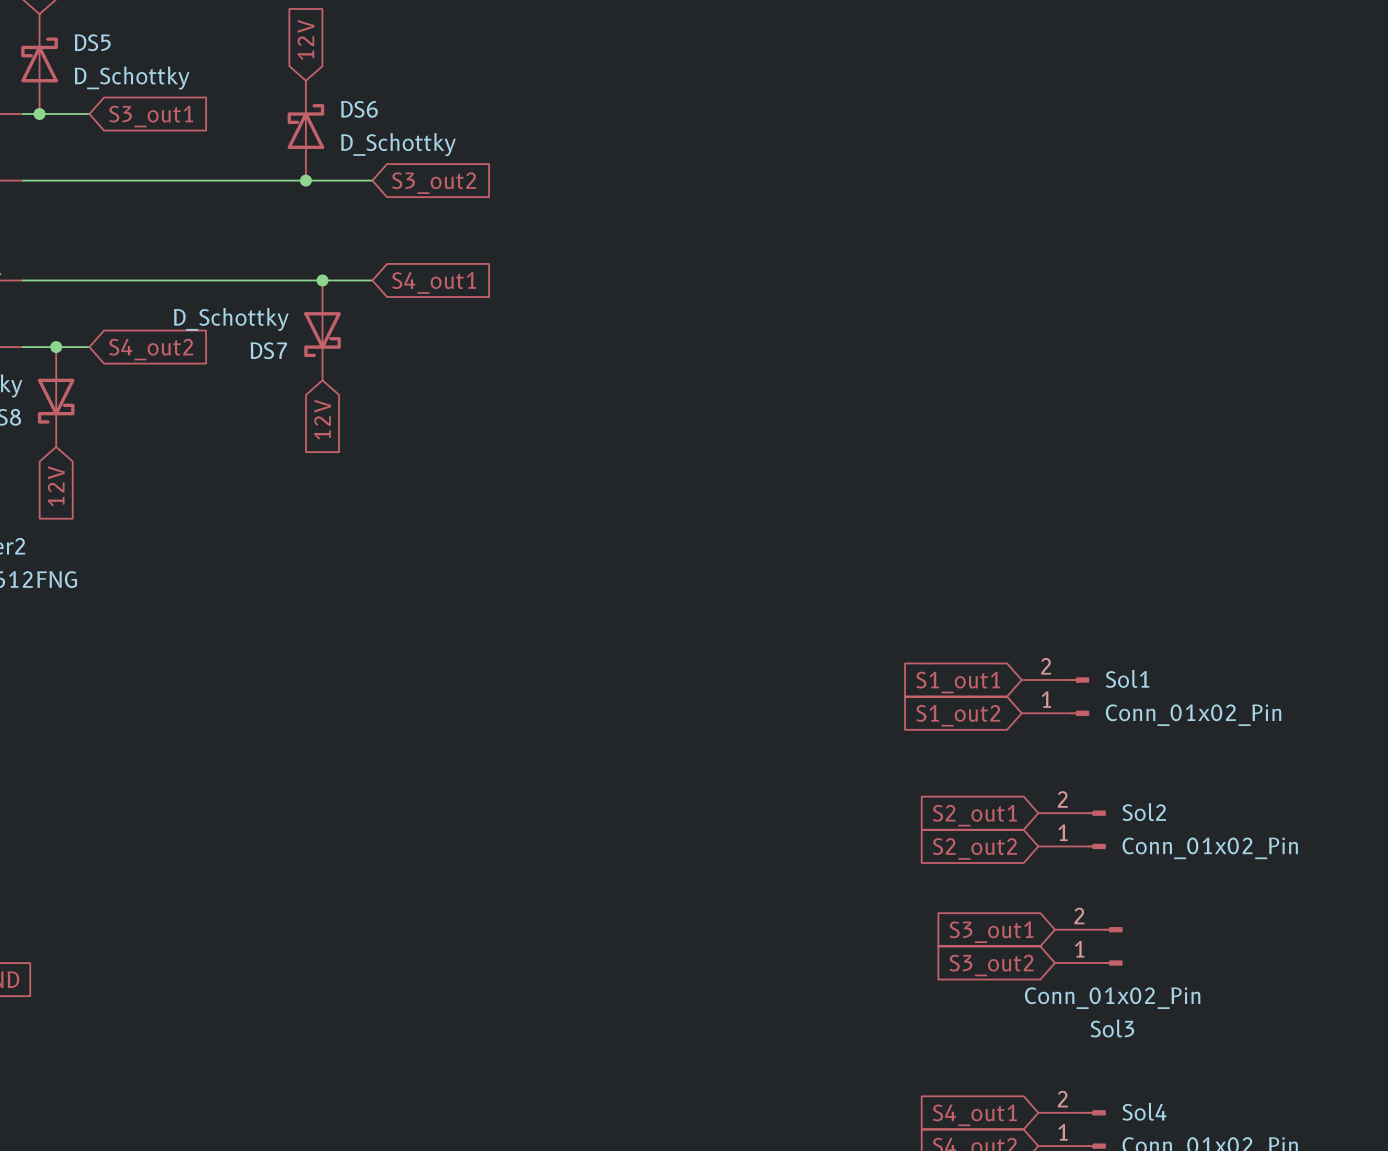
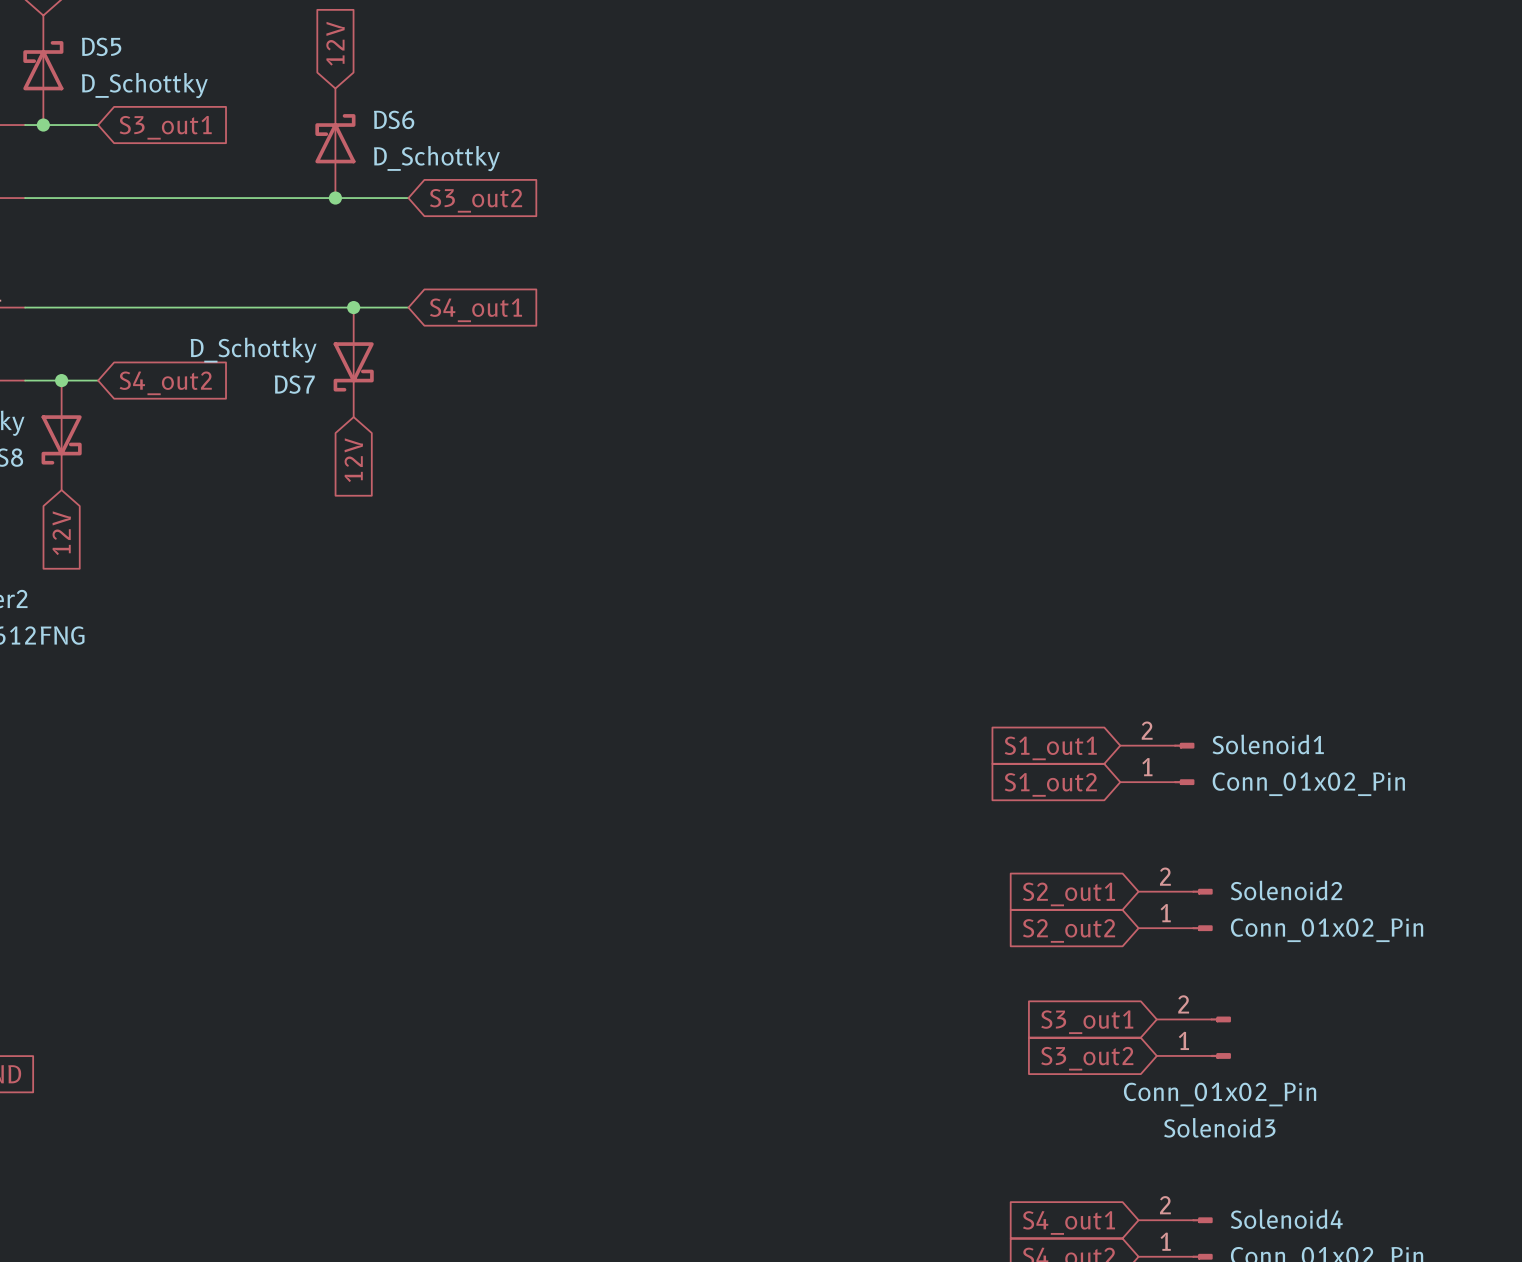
Sol1 name: Sol1 (1127, 678) -> Solenoid1 (1268, 744)
Sol2 name: Sol2 (1144, 812) -> Solenoid2 (1286, 890)
Sol3 name: Sol3 (1112, 1028) -> Solenoid3 (1219, 1127)
Sol4 name: Sol4 (1144, 1111) -> Solenoid4 (1286, 1219)

